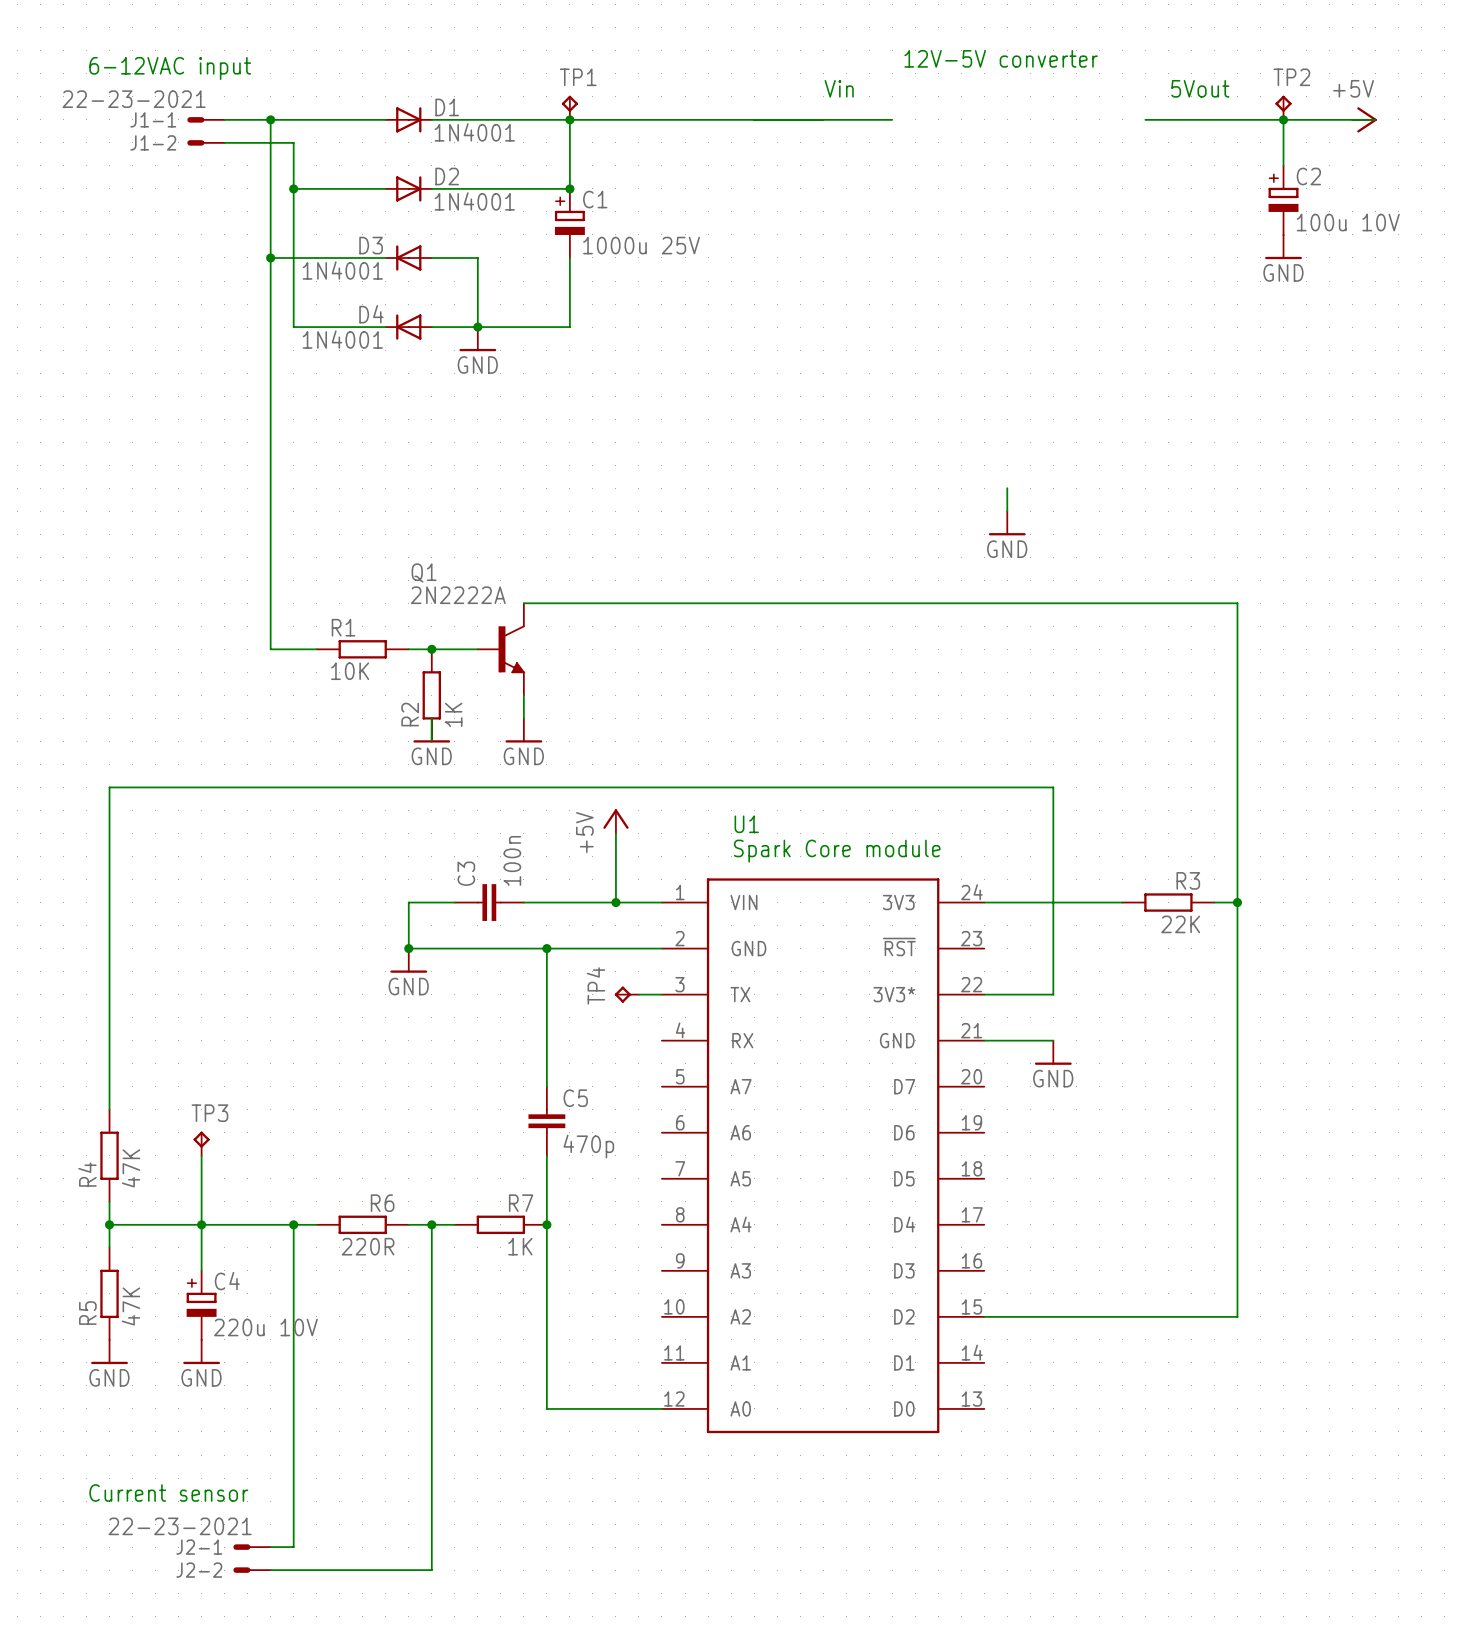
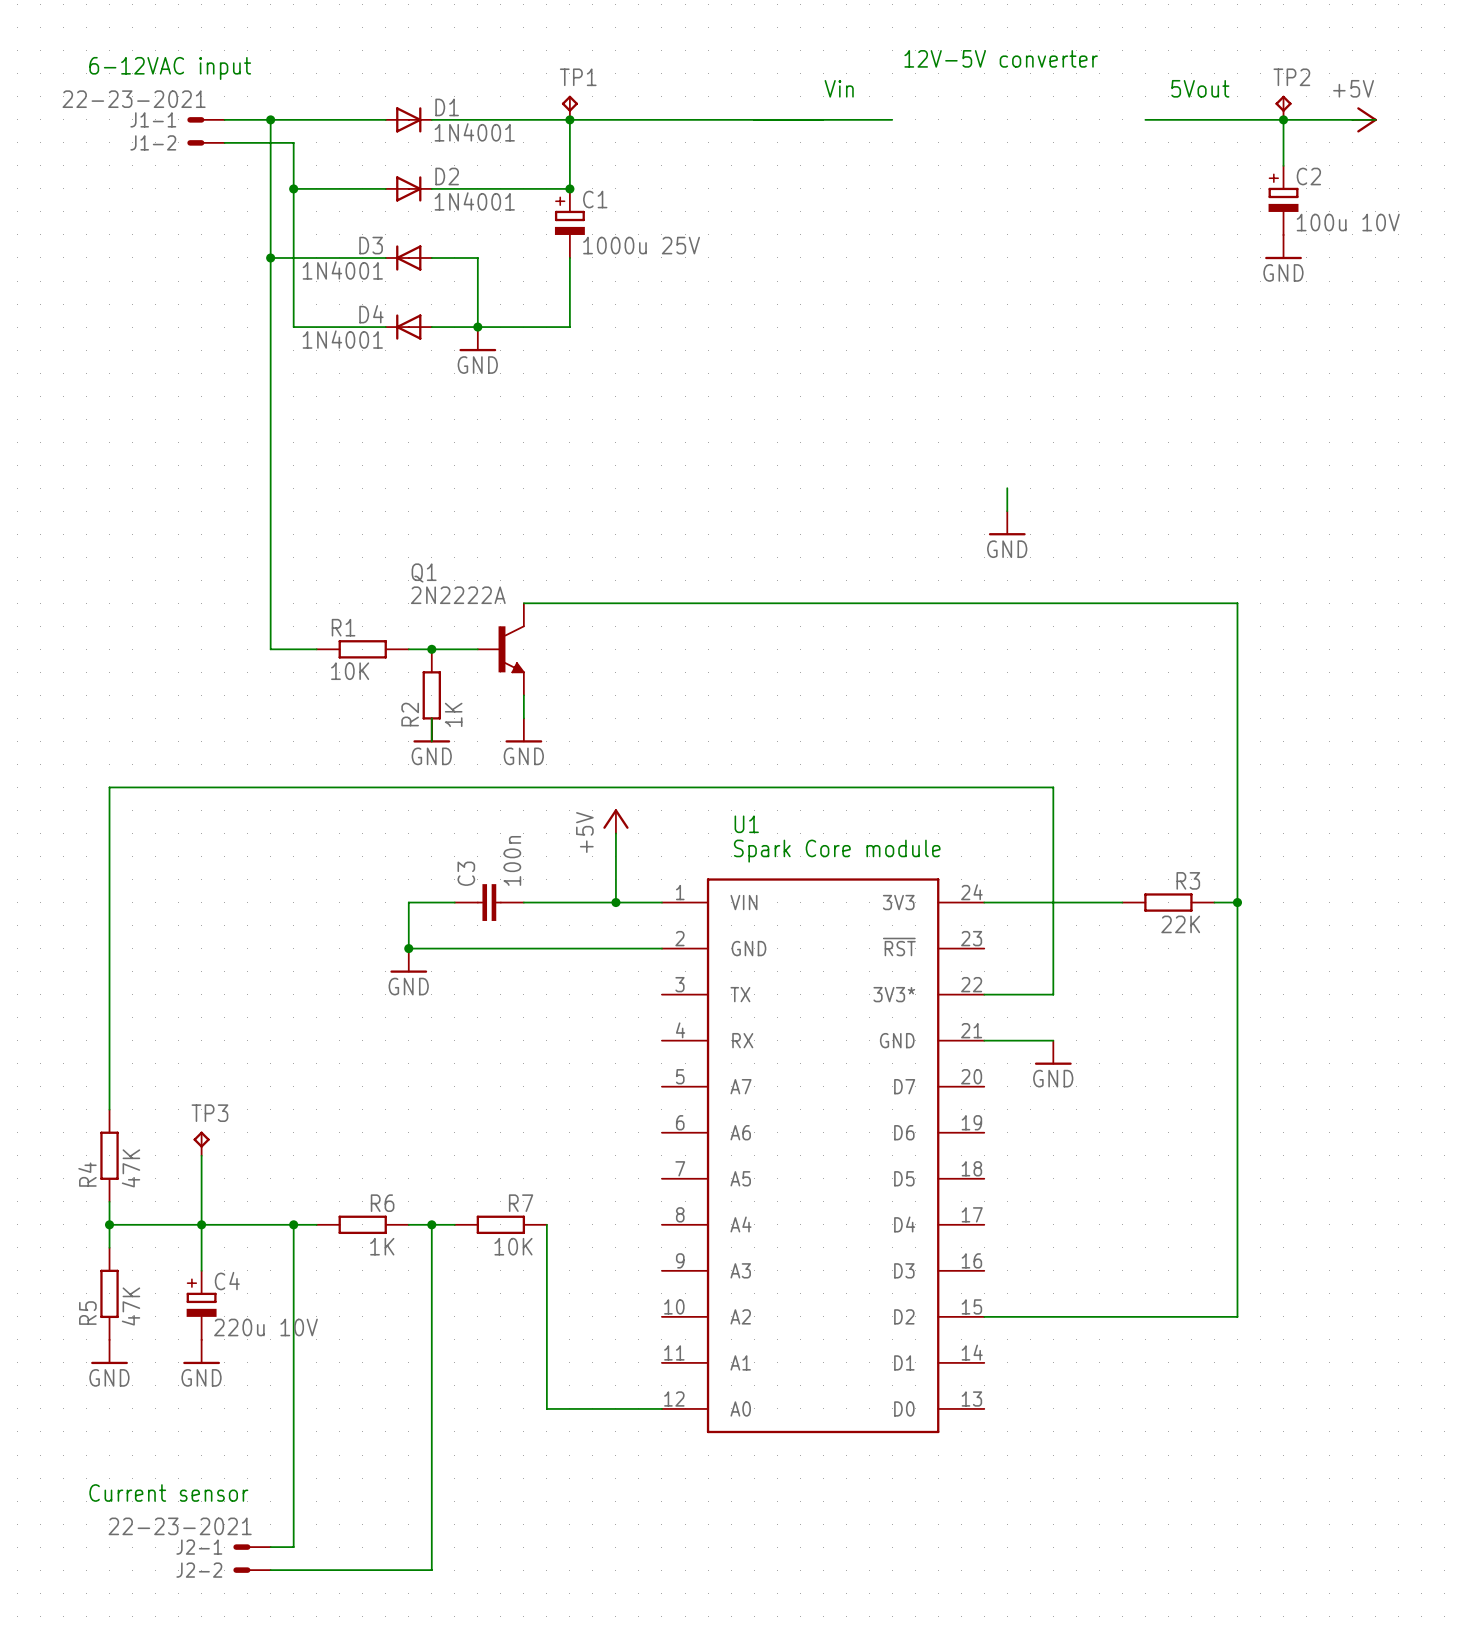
wire: (546, 948) (546, 1086) -> none
junction: (546, 948) -> none
TP4: (626, 994) -> none
wire: (638, 994) (661, 994) -> none
C5: 470p (546, 1121) -> none
wire: (546, 1155) (546, 1224) -> none
junction: (546, 1224) -> none
R6 value: 220R (368, 1246) -> 1K (382, 1246)
R7 value: 1K (520, 1246) -> 10K (513, 1246)

